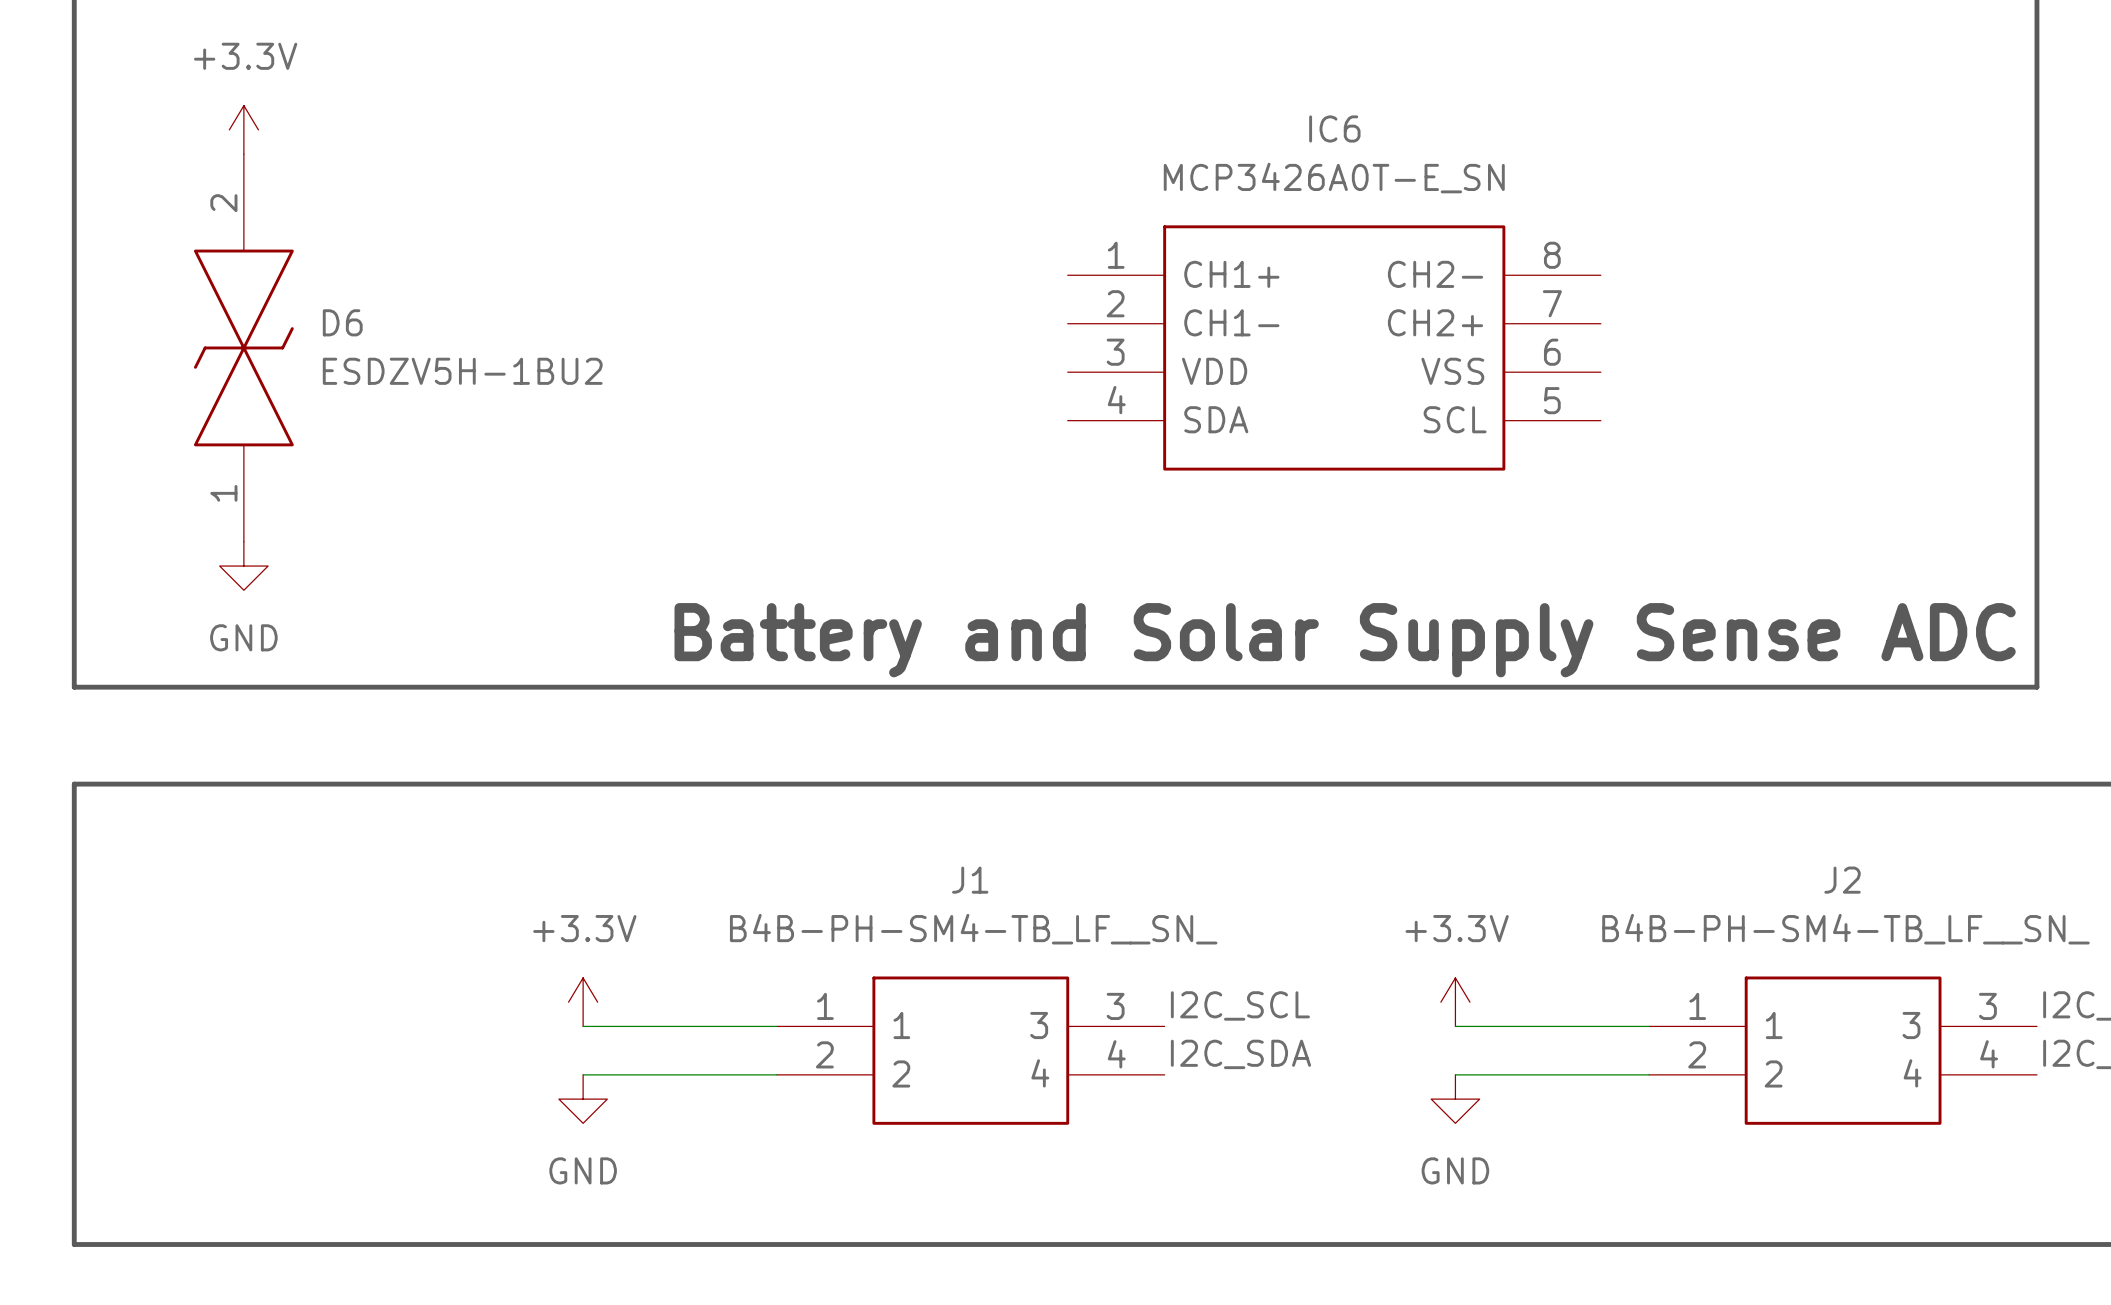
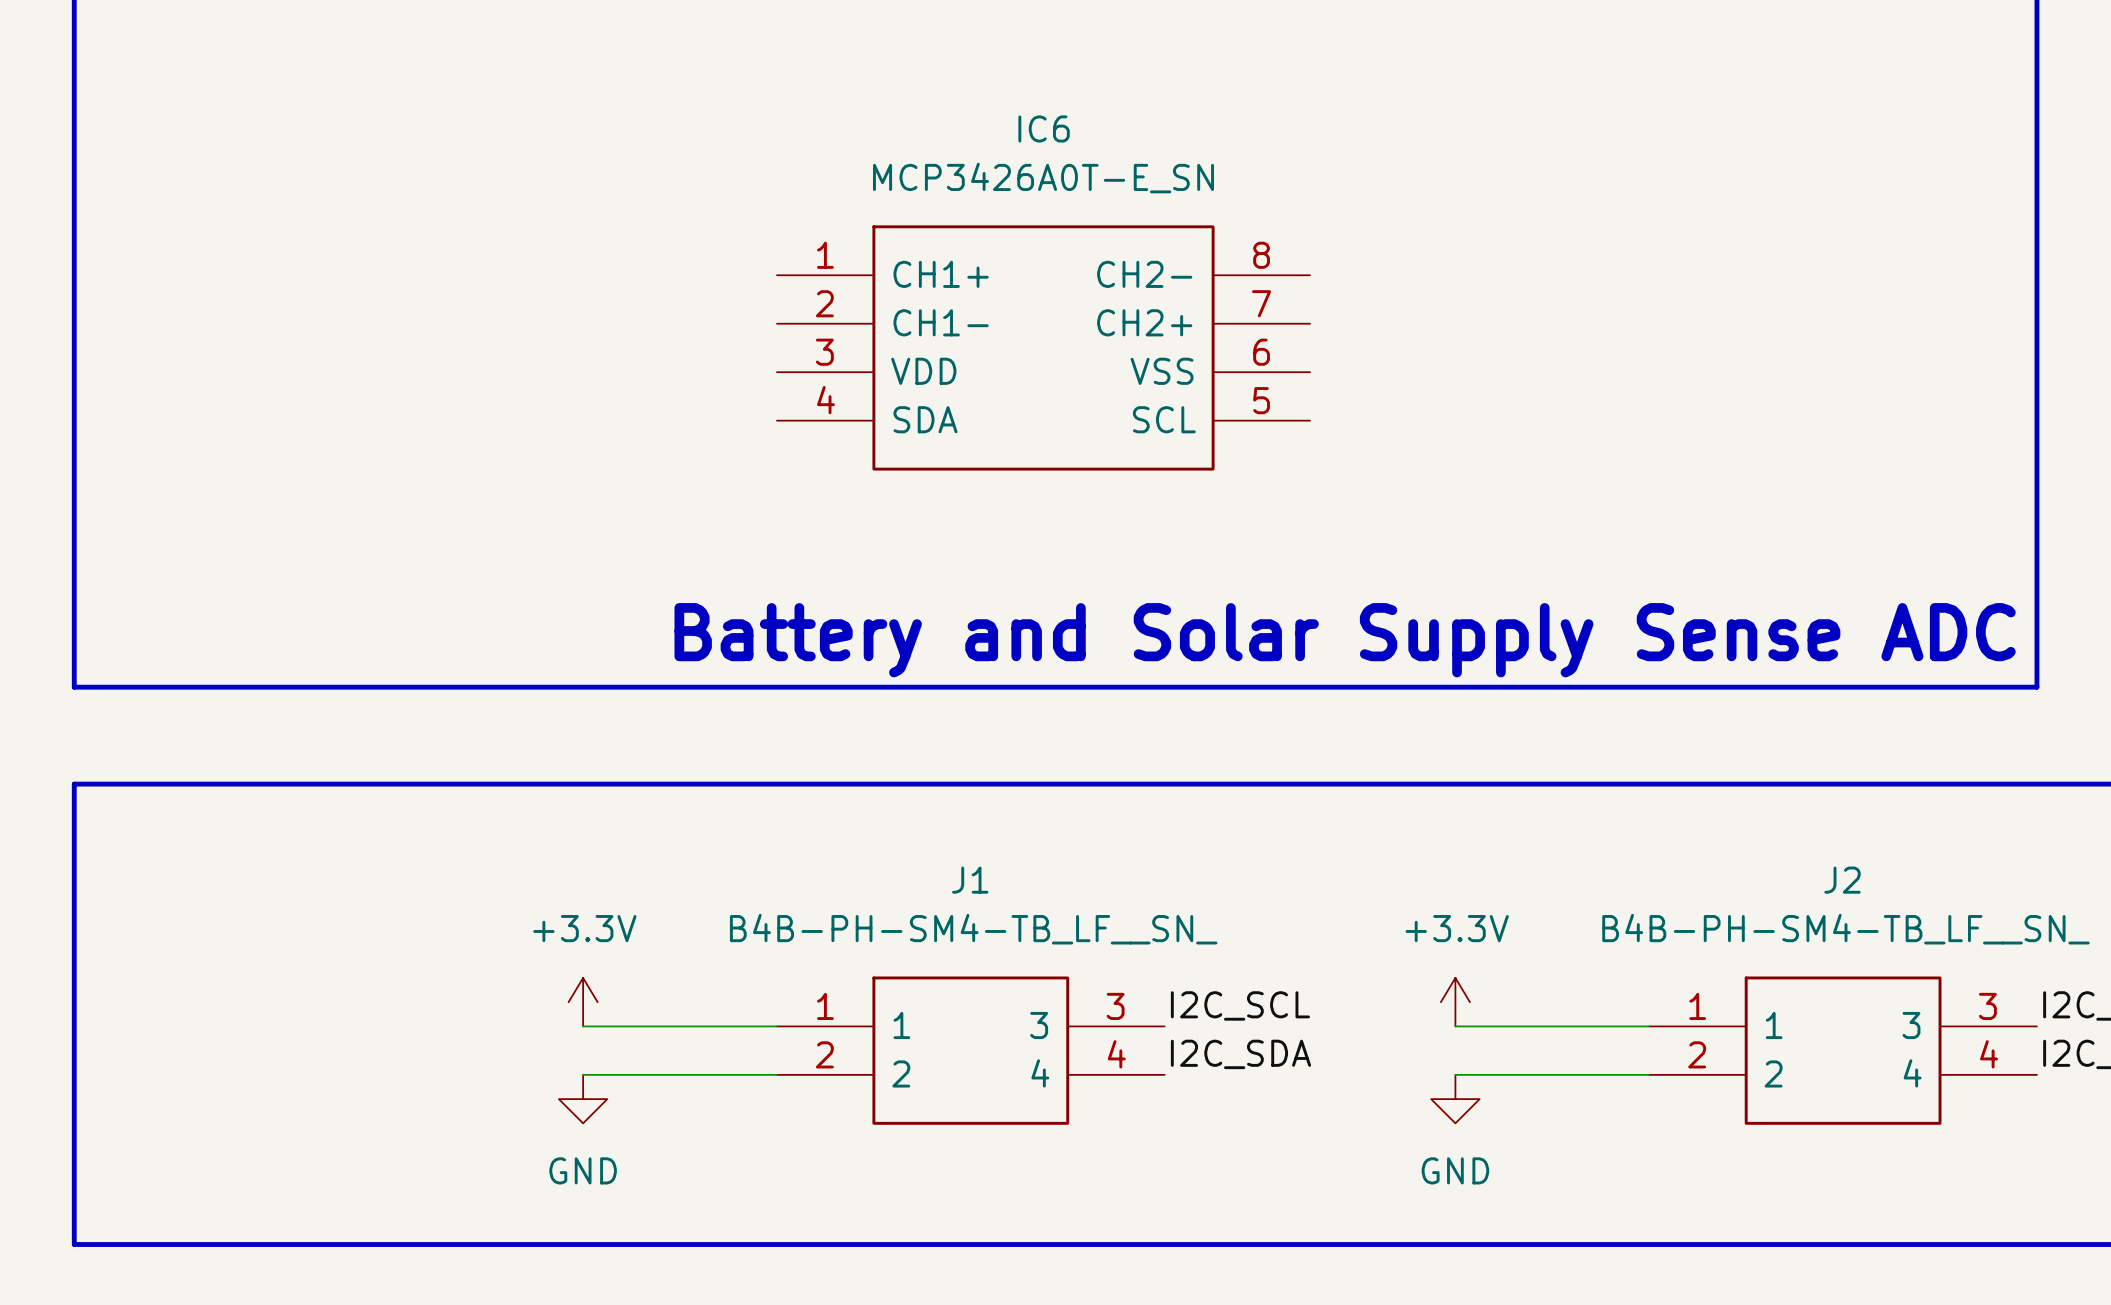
power symbol: +3.3V (243, 129) -> none
D6: ESDZV5H-1BU2 (243, 347) -> none
IC6 position: (1334, 347) -> (1043, 347)
power symbol: GND (243, 566) -> none

